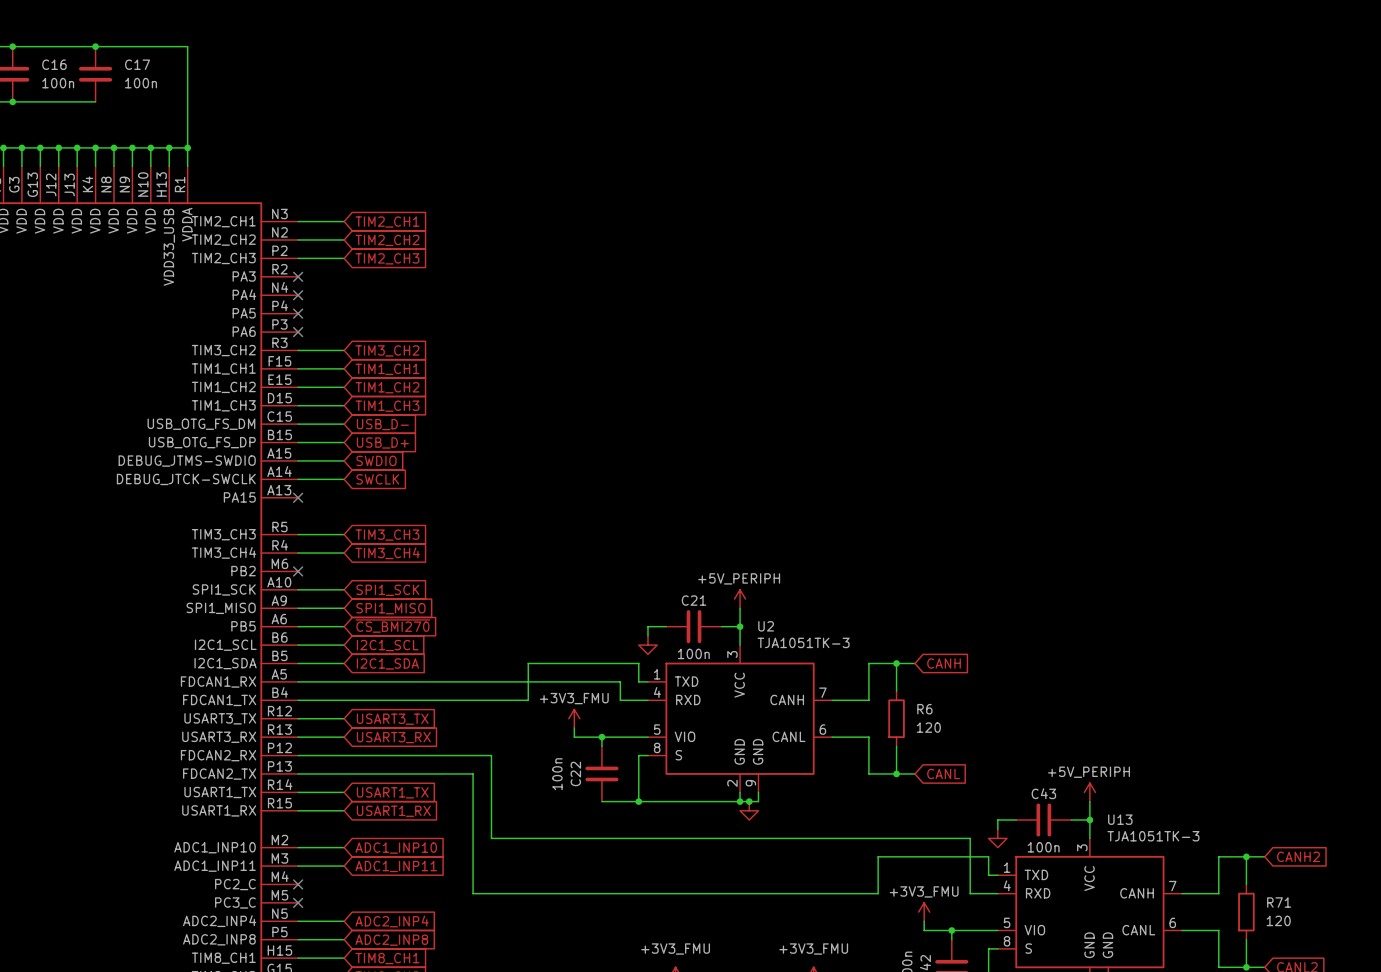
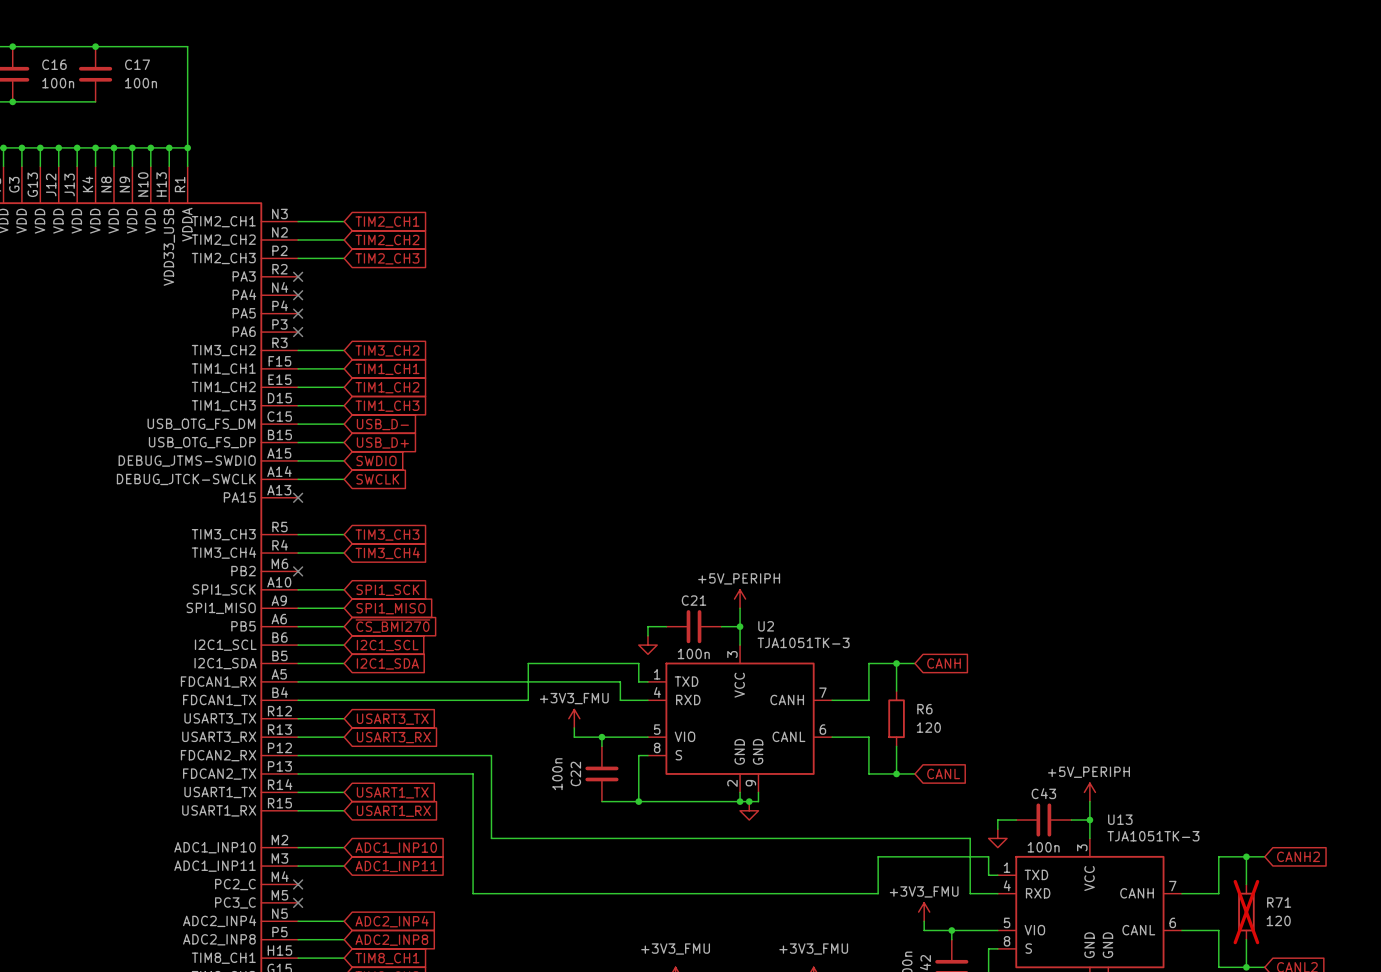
R71 do-not-place cross: none -> (1246, 912)

